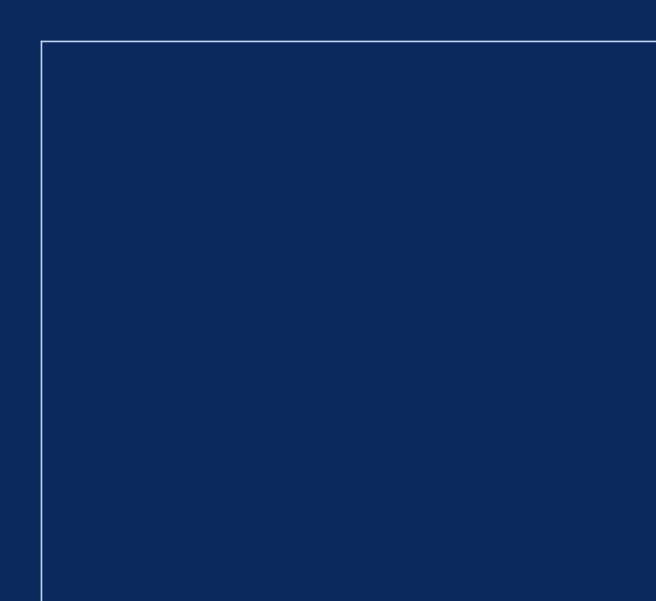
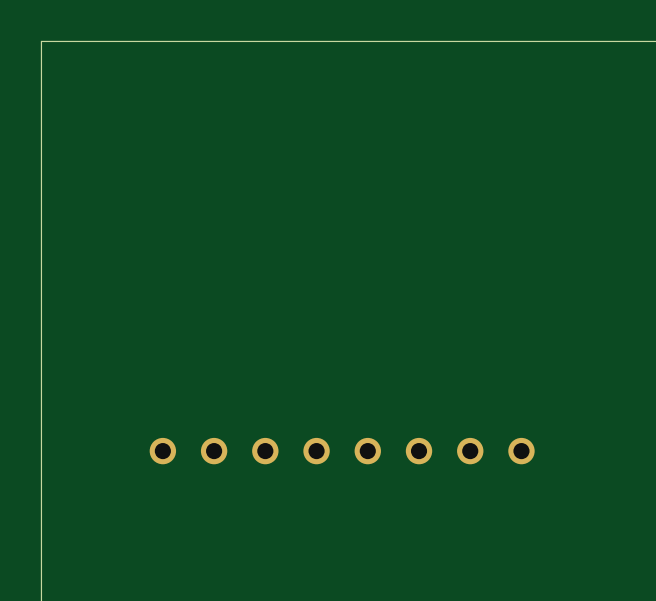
part: none -> (342, 451)

